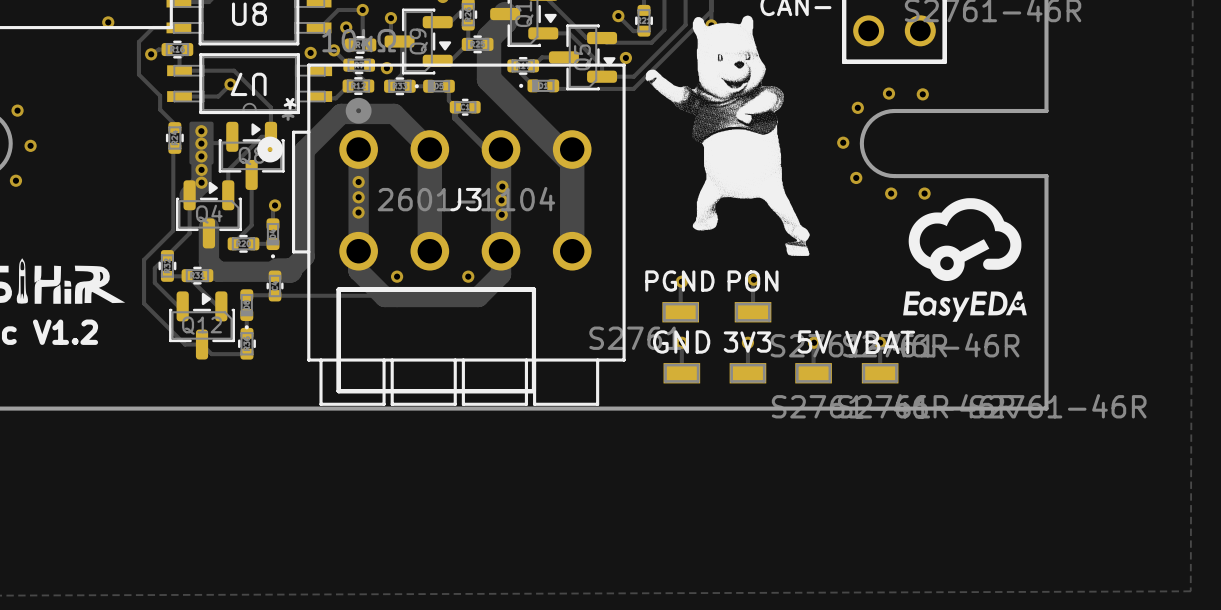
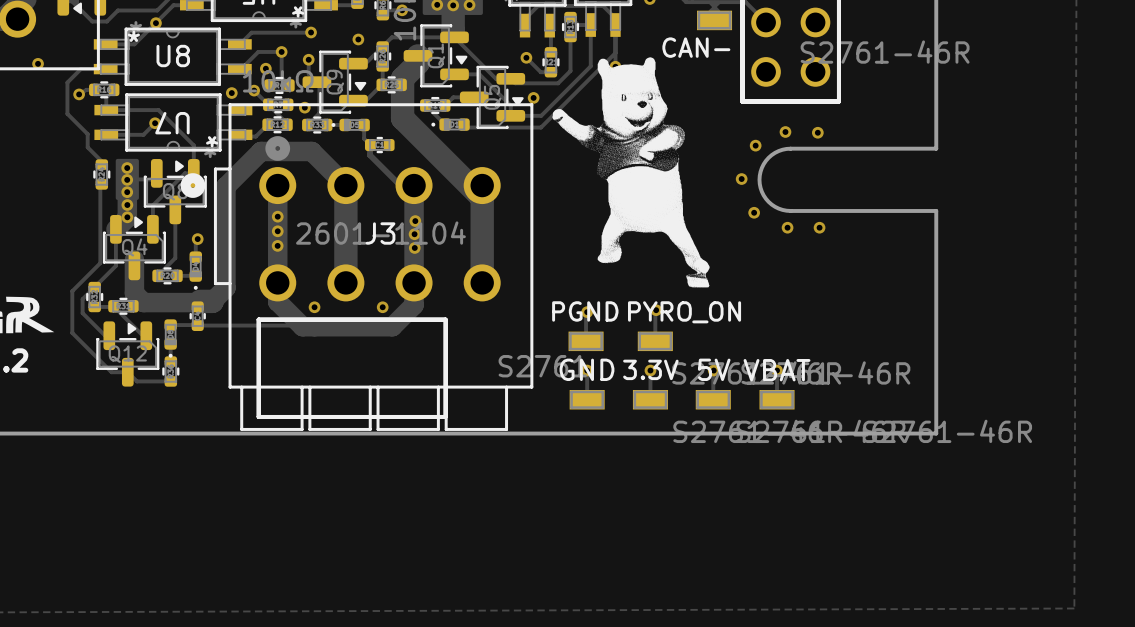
drawing: [903, 198, 1027, 322] -> none
PON name: PON (753, 281) -> PYRO_ON (684, 312)
3V3 name: 3V3 (747, 342) -> 3.3V (650, 369)

